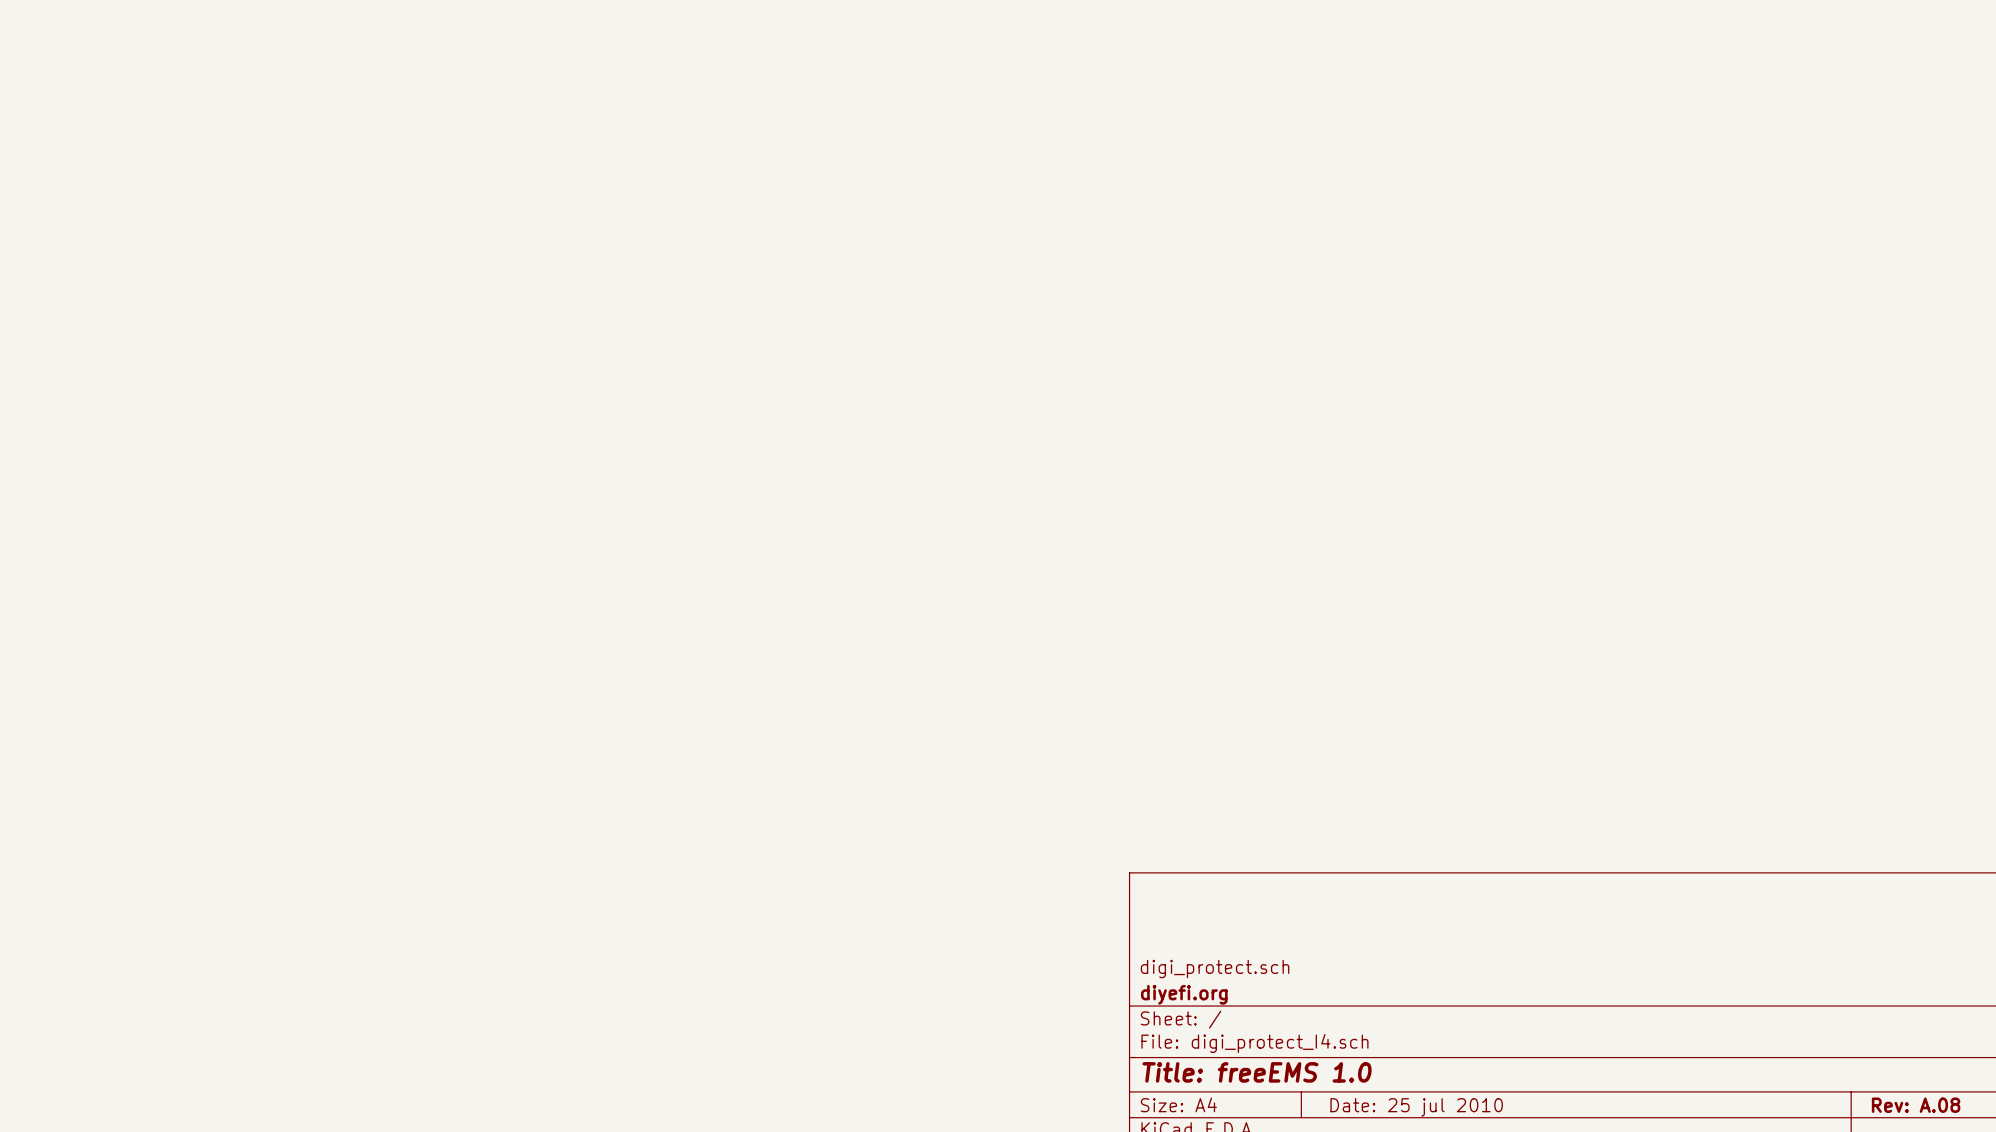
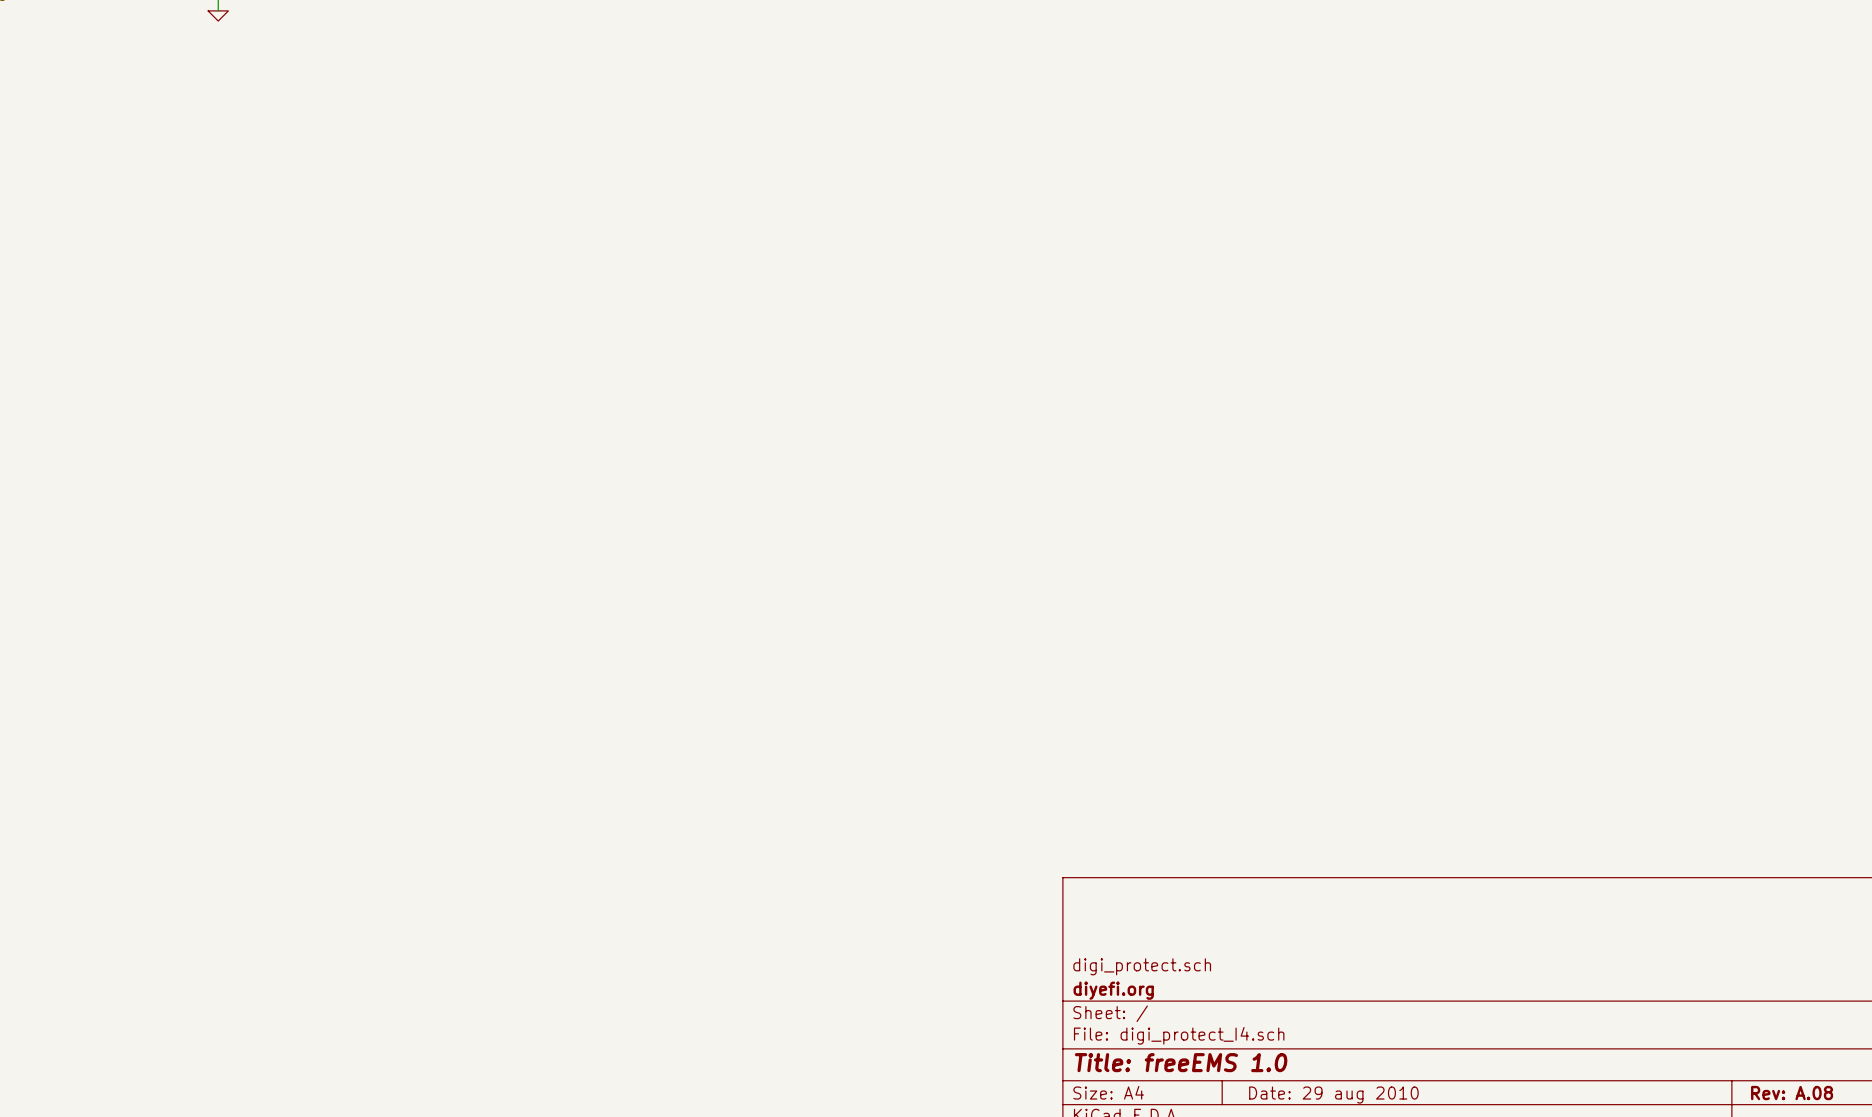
title block: Date: 25 jul 2010 (1416, 1107) -> Date: 29 aug 2010 (1333, 1095)

